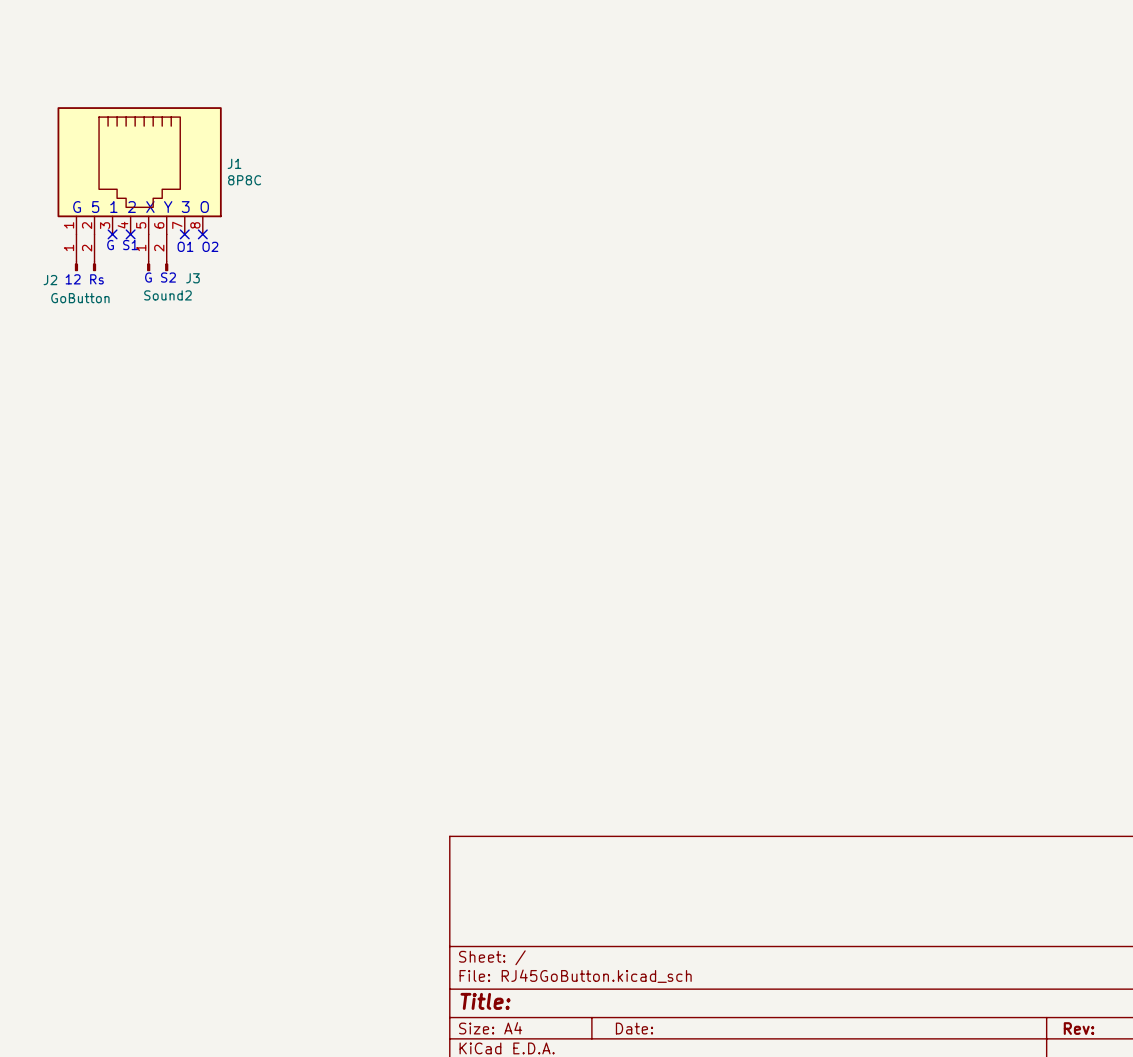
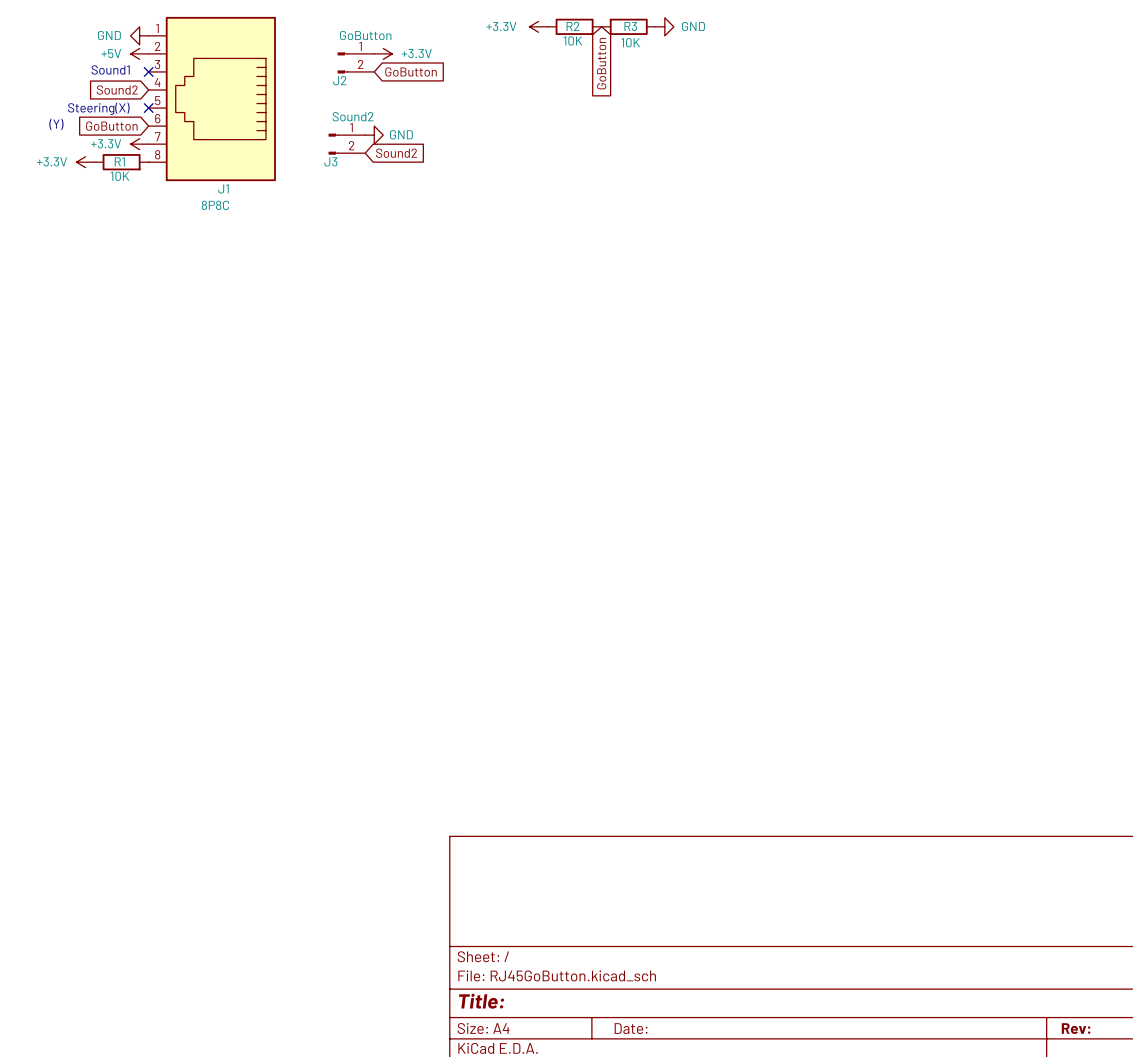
power symbol: none -> +3.3V (538, 26)
R2: none -> 10K (574, 26)
R3: none -> 10K (628, 26)
power symbol: none -> GND (664, 26)
power symbol: none -> GND (139, 35)
power symbol: none -> +5V (139, 53)
power symbol: none -> +3.3V (383, 53)
global label: none -> GoButton (601, 63)
text: none -> Sound1 (110, 69)
no-connect mark: none -> (148, 71)
global label: none -> GoButton (411, 71)
global label: none -> Sound2 (117, 90)
text: none -> Steering(X) (98, 108)
no-connect mark: none -> (148, 108)
text: none -> (Y) (56, 124)
global label: none -> GoButton (111, 126)
power symbol: none -> GND (374, 135)
power symbol: none -> +3.3V (139, 144)
global label: none -> Sound2 (396, 153)
power symbol: none -> +3.3V (85, 162)
R1: none -> 10K (121, 162)
J1 rotation: 0° (139, 162) -> 90° clockwise (220, 99)
J1 position: (139, 170) -> (212, 99)
text: G 5 1 2 X Y 3 O (141, 207) -> none
no-connect mark: (112, 234) -> none
no-connect mark: (130, 234) -> none
no-connect mark: (184, 234) -> none
no-connect mark: (202, 234) -> none
text: G S1 (122, 245) -> none
text: O1 O2 (197, 246) -> none
J2 position: (85, 252) -> (355, 62)
J3 position: (157, 252) -> (346, 144)
J2 rotation: 0° (85, 265) -> 90° clockwise (342, 62)
J3 rotation: 0° (157, 265) -> 90° clockwise (333, 144)
text: G S2 (160, 277) -> none
J3 name position: J3 (192, 278) -> J3 (330, 161)
text: 12 Rs (84, 279) -> none
J2 name position: J2 (50, 280) -> J2 (339, 80)
J3 value position: Sound2 (167, 295) -> Sound2 (353, 116)
J2 value position: GoButton (80, 298) -> GoButton (365, 35)

